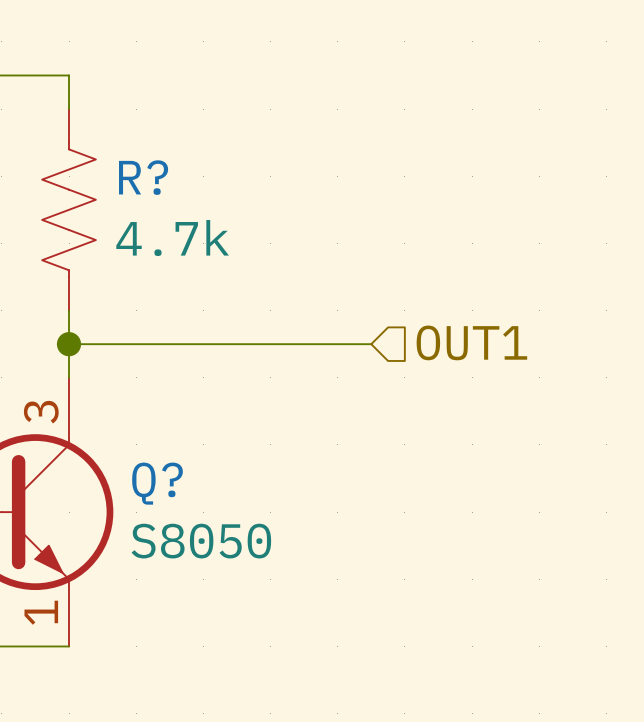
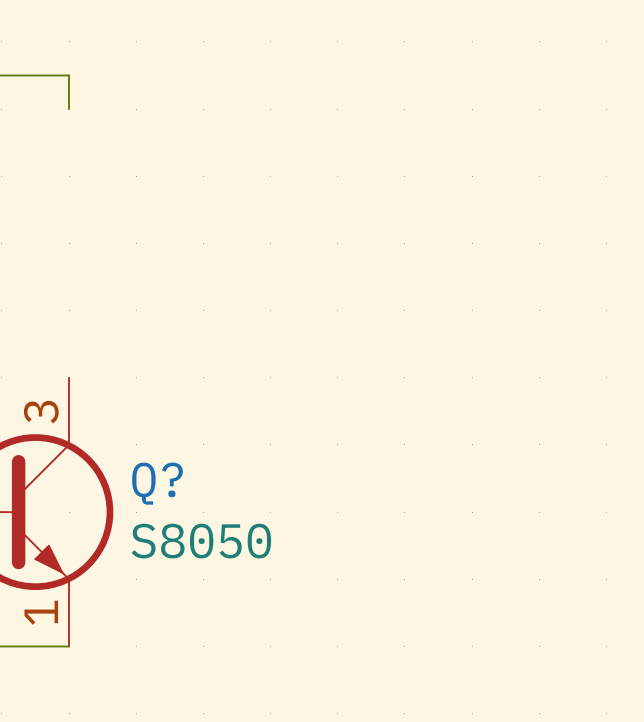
R?: 4.7k (69, 209) -> none
wire: (69, 310) (69, 377) -> none
hierarchical label: OUT1 (471, 342) -> none
wire: (69, 344) (371, 344) -> none
junction: (69, 344) -> none

